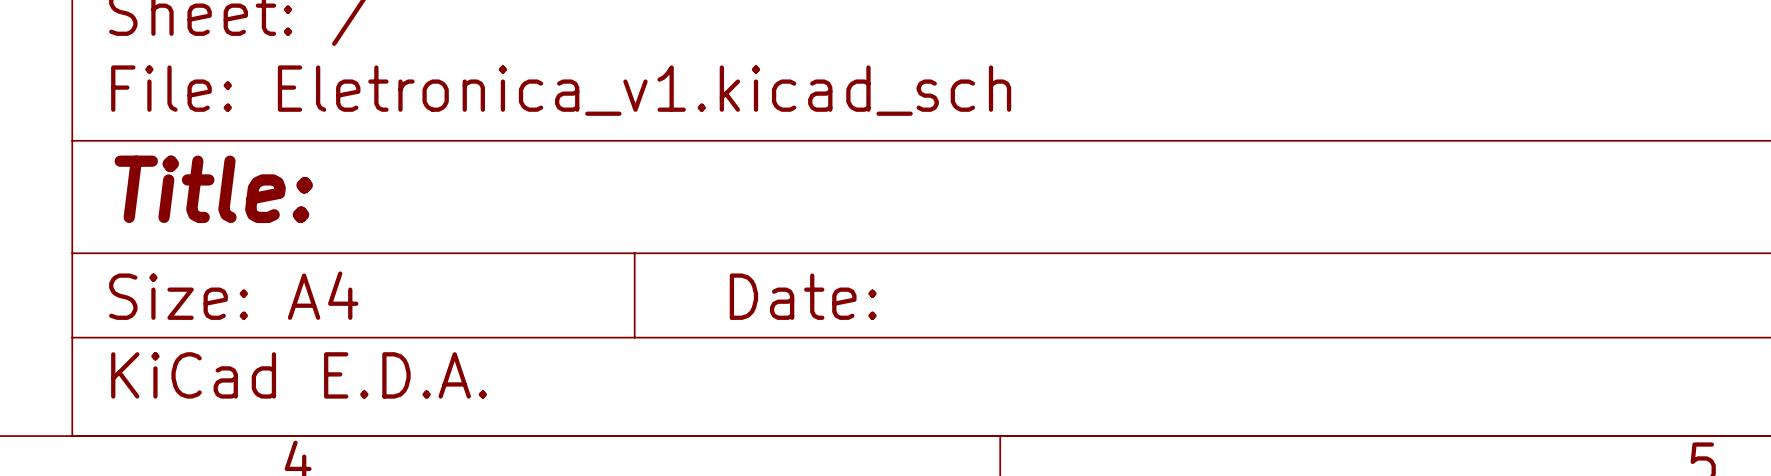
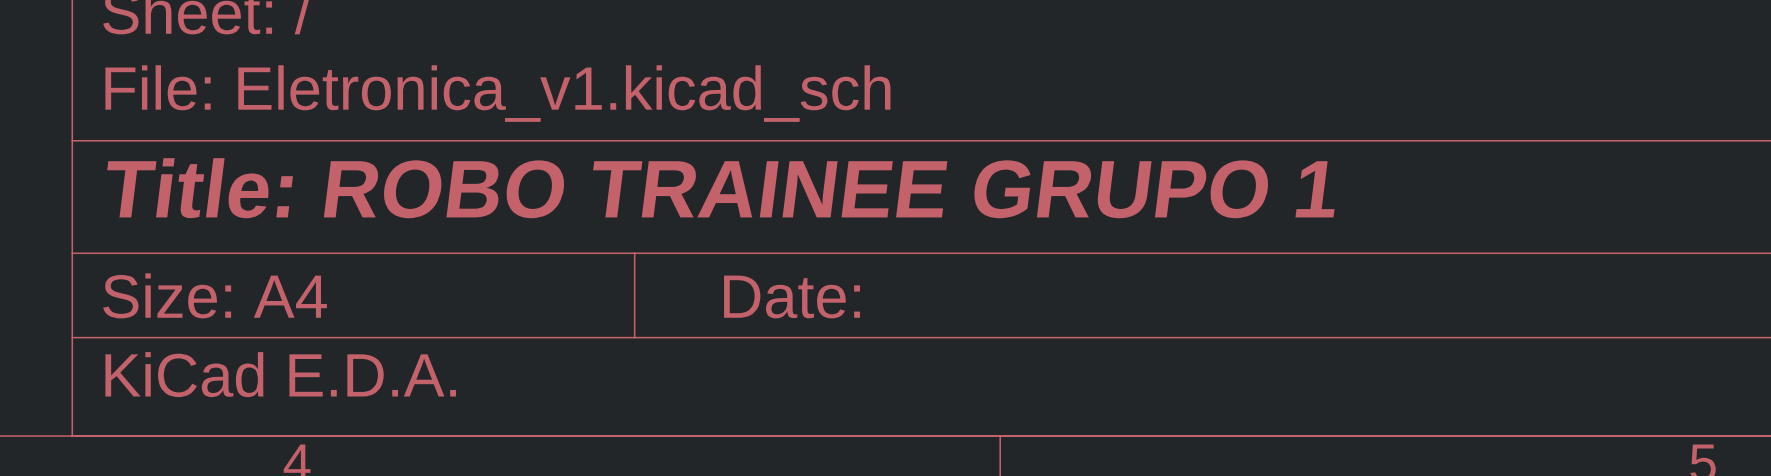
title block: Title: (213, 189) -> Title: ROBO TRAINEE GRUPO 1 (720, 188)

